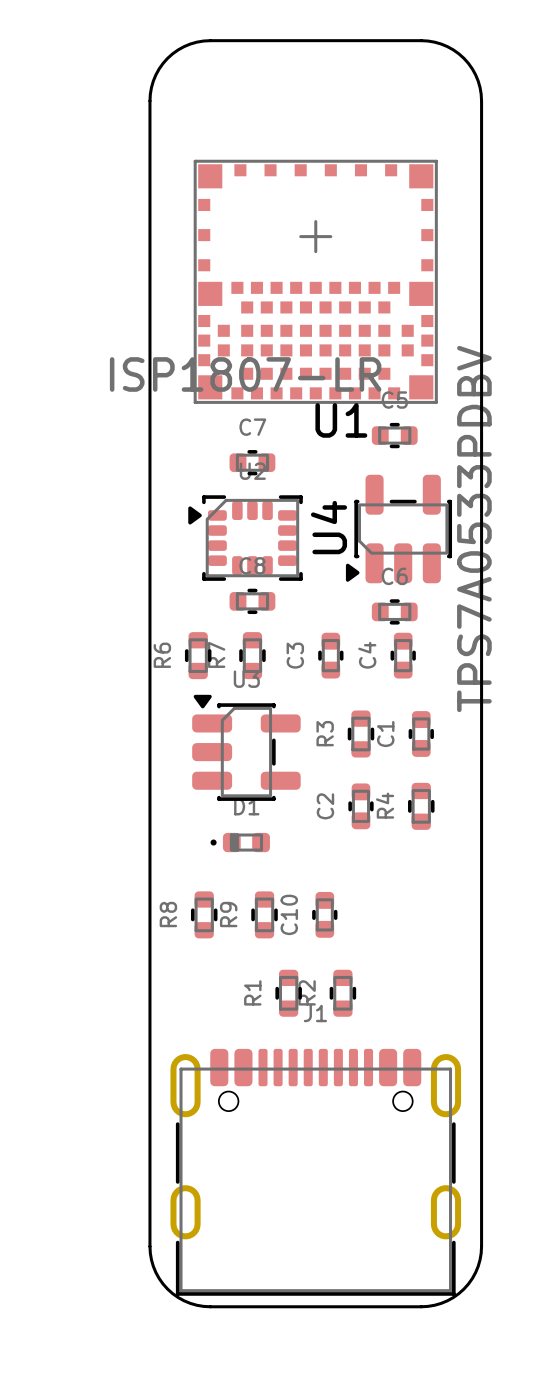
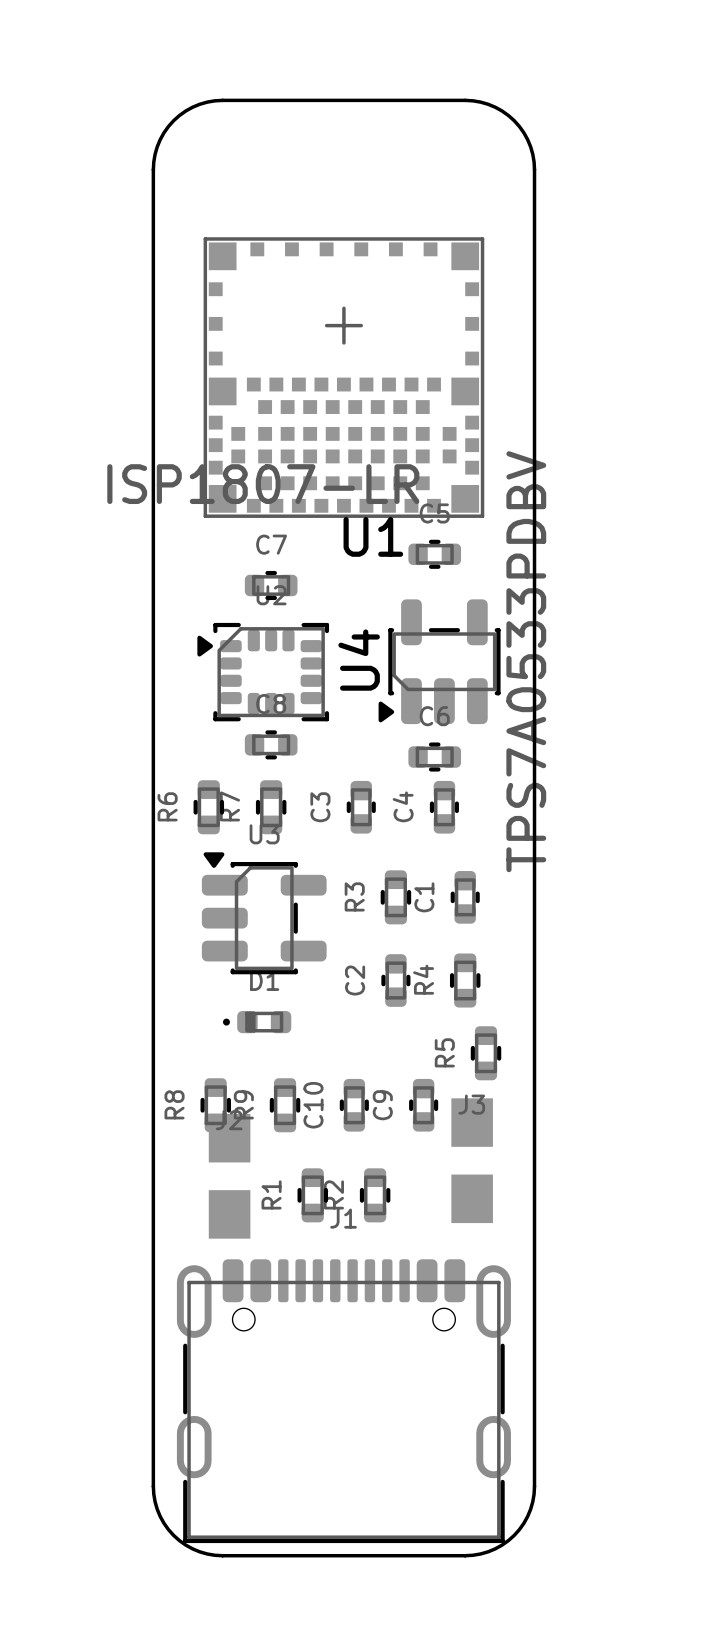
R5: none -> (486, 1053)
C9: none -> (423, 1105)
part: none -> (472, 1160)
part: none -> (229, 1176)

